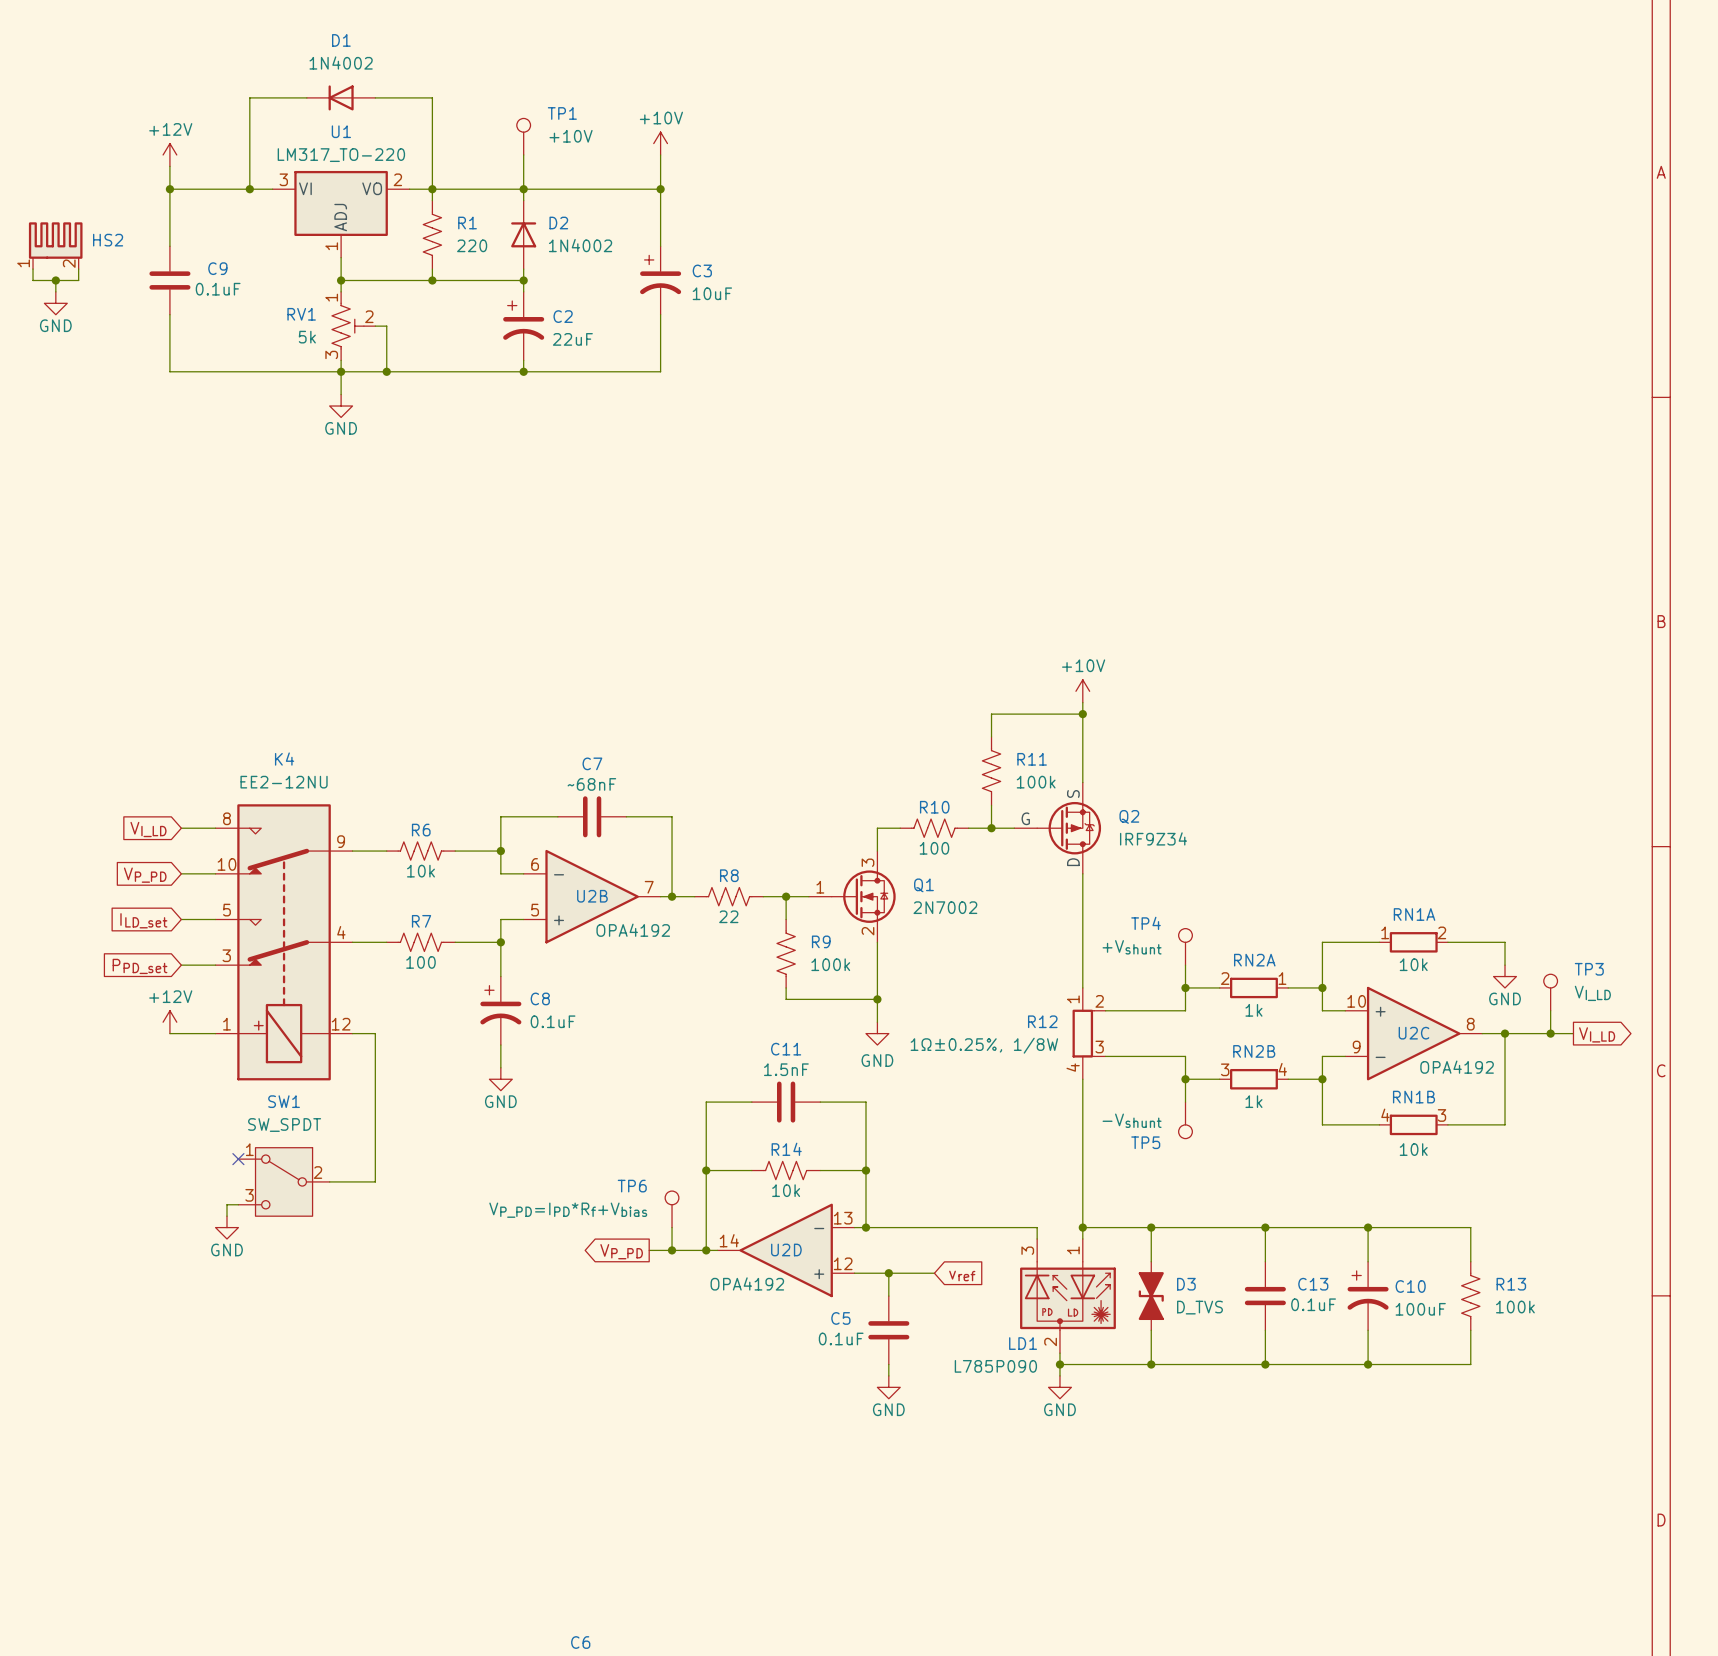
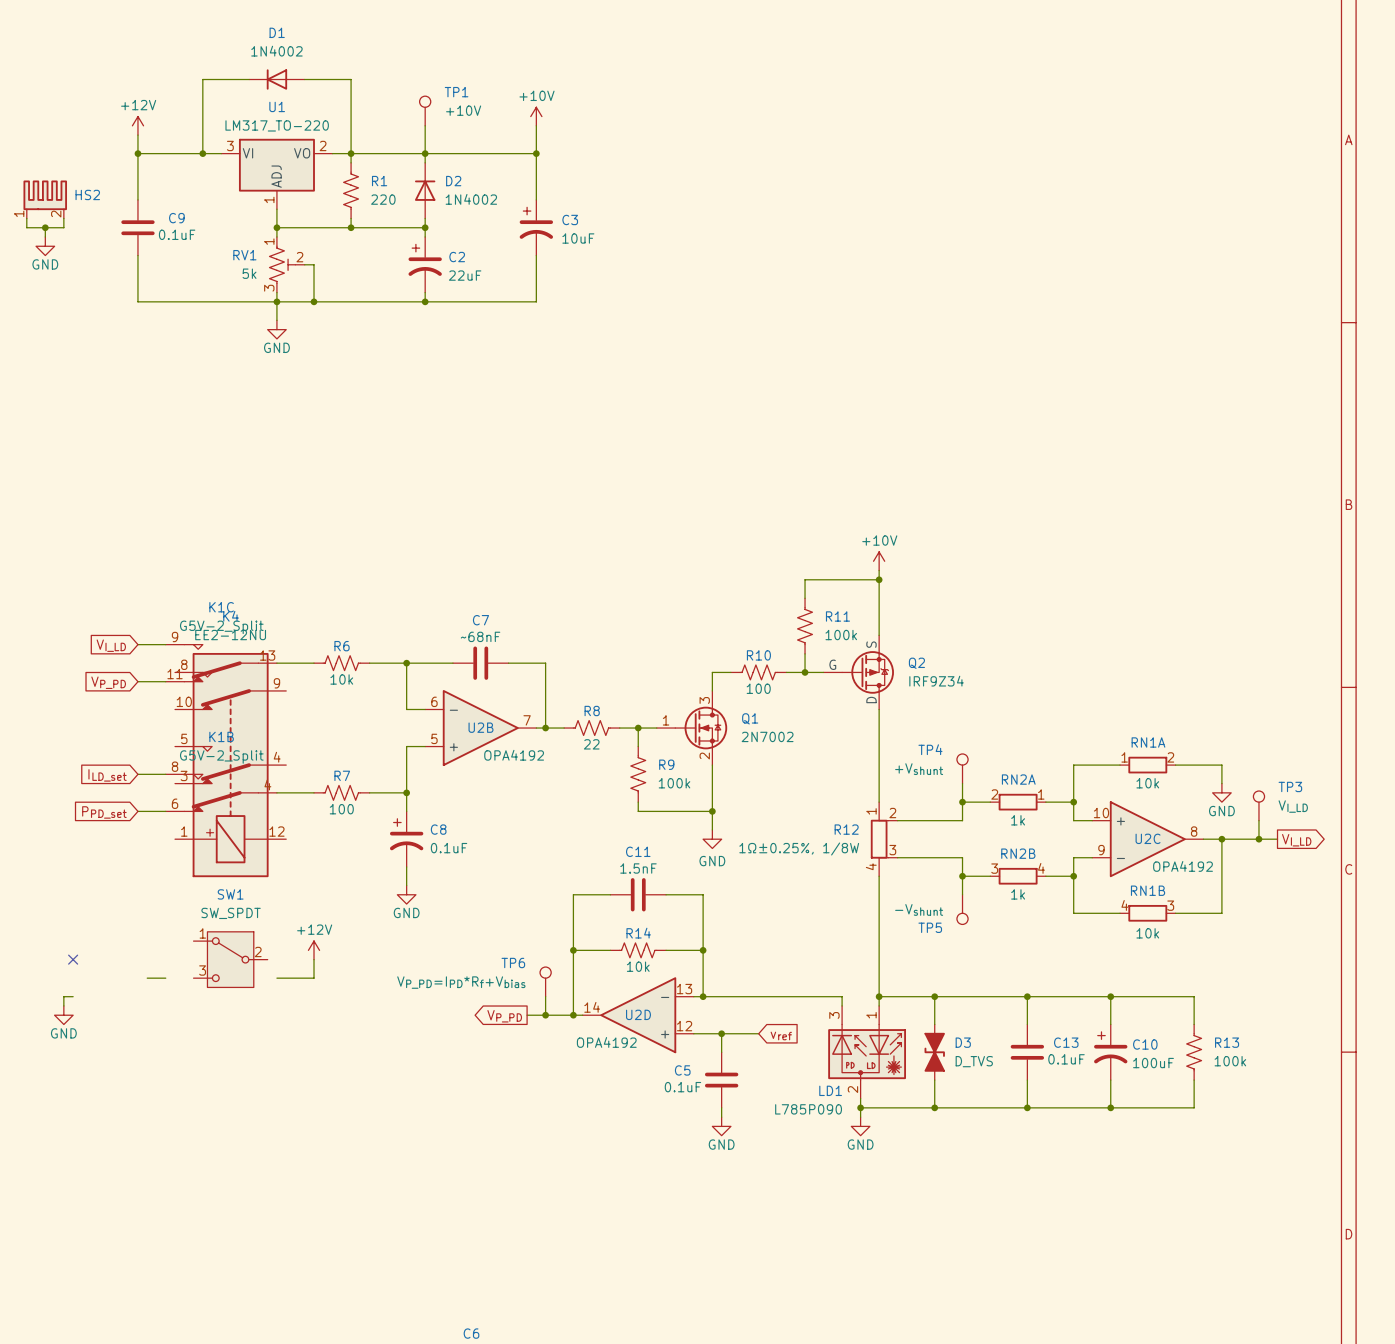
K1C: none -> G5V-2_Split (221, 663)
wire: none -> (276, 663) (314, 663)
wire: (181, 828) (215, 828) -> (137, 644) (165, 644)
global label position: VI_LD (148, 829) -> VI_LD (111, 645)
wire: (352, 851) (386, 851) -> none
R6 position: (420, 851) -> (341, 663)
wire: (455, 851) (500, 851) -> (369, 663) (406, 663)
junction position: (500, 851) -> (406, 663)
wire: (181, 873) (215, 873) -> (137, 681) (165, 681)
global label position: VP_PD (145, 875) -> VP_PD (108, 682)
wire: (181, 919) (215, 919) -> (137, 774) (165, 774)
global label position: ILD_set (143, 920) -> ILD_set (107, 775)
wire: (352, 942) (386, 942) -> none
R7 position: (420, 942) -> (341, 792)
wire: (455, 942) (500, 942) -> (276, 792) (314, 792)
junction position: (500, 942) -> (406, 792)
wire: (181, 965) (215, 965) -> (137, 811) (165, 811)
global label position: PPD_set (140, 966) -> PPD_set (104, 812)
K1B: none -> G5V-2_Split (221, 792)
wire: none -> (369, 792) (406, 792) (406, 811)
C8 position: (500, 1010) -> (406, 839)
power symbol: +12V (169, 1022) -> none
wire: (169, 1033) (215, 1033) -> none
wire: (352, 1033) (375, 1033) (375, 1181) (329, 1181) -> none
power symbol position: GND (500, 1079) -> GND (406, 894)
no-connect mark: (238, 1159) -> none
power symbol: none -> +12V (314, 950)
no-connect mark: none -> (73, 959)
wire: none -> (314, 959) (314, 978) (276, 978)
wire: none -> (147, 978) (165, 978)
wire: (238, 1204) (226, 1204) (226, 1216) -> (73, 996) (63, 996) (63, 1005)
power symbol position: GND (226, 1227) -> GND (63, 1015)

